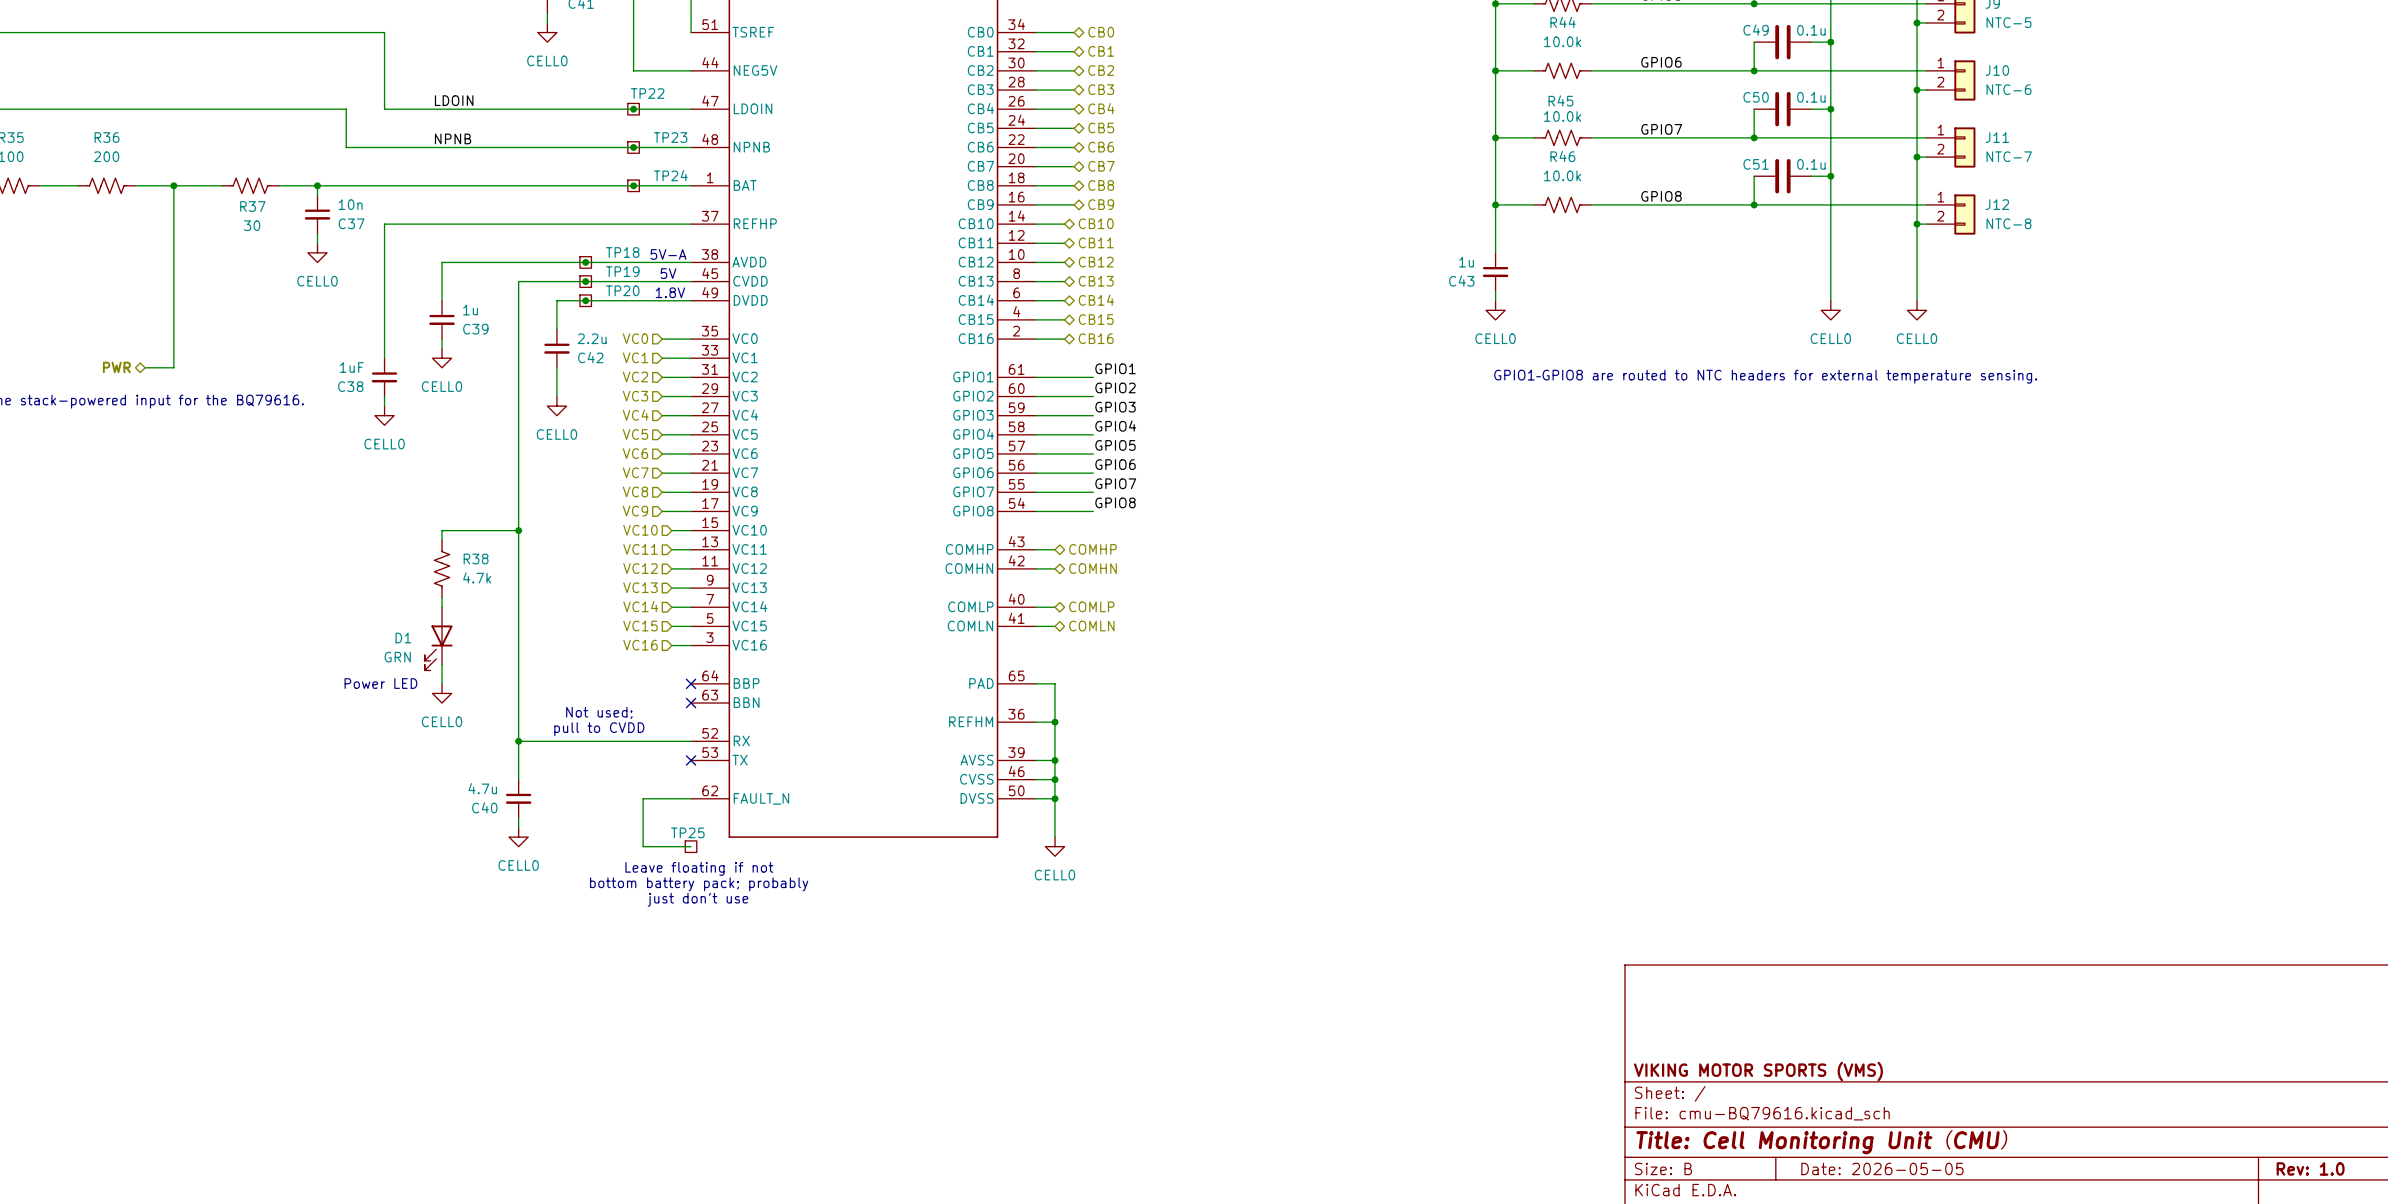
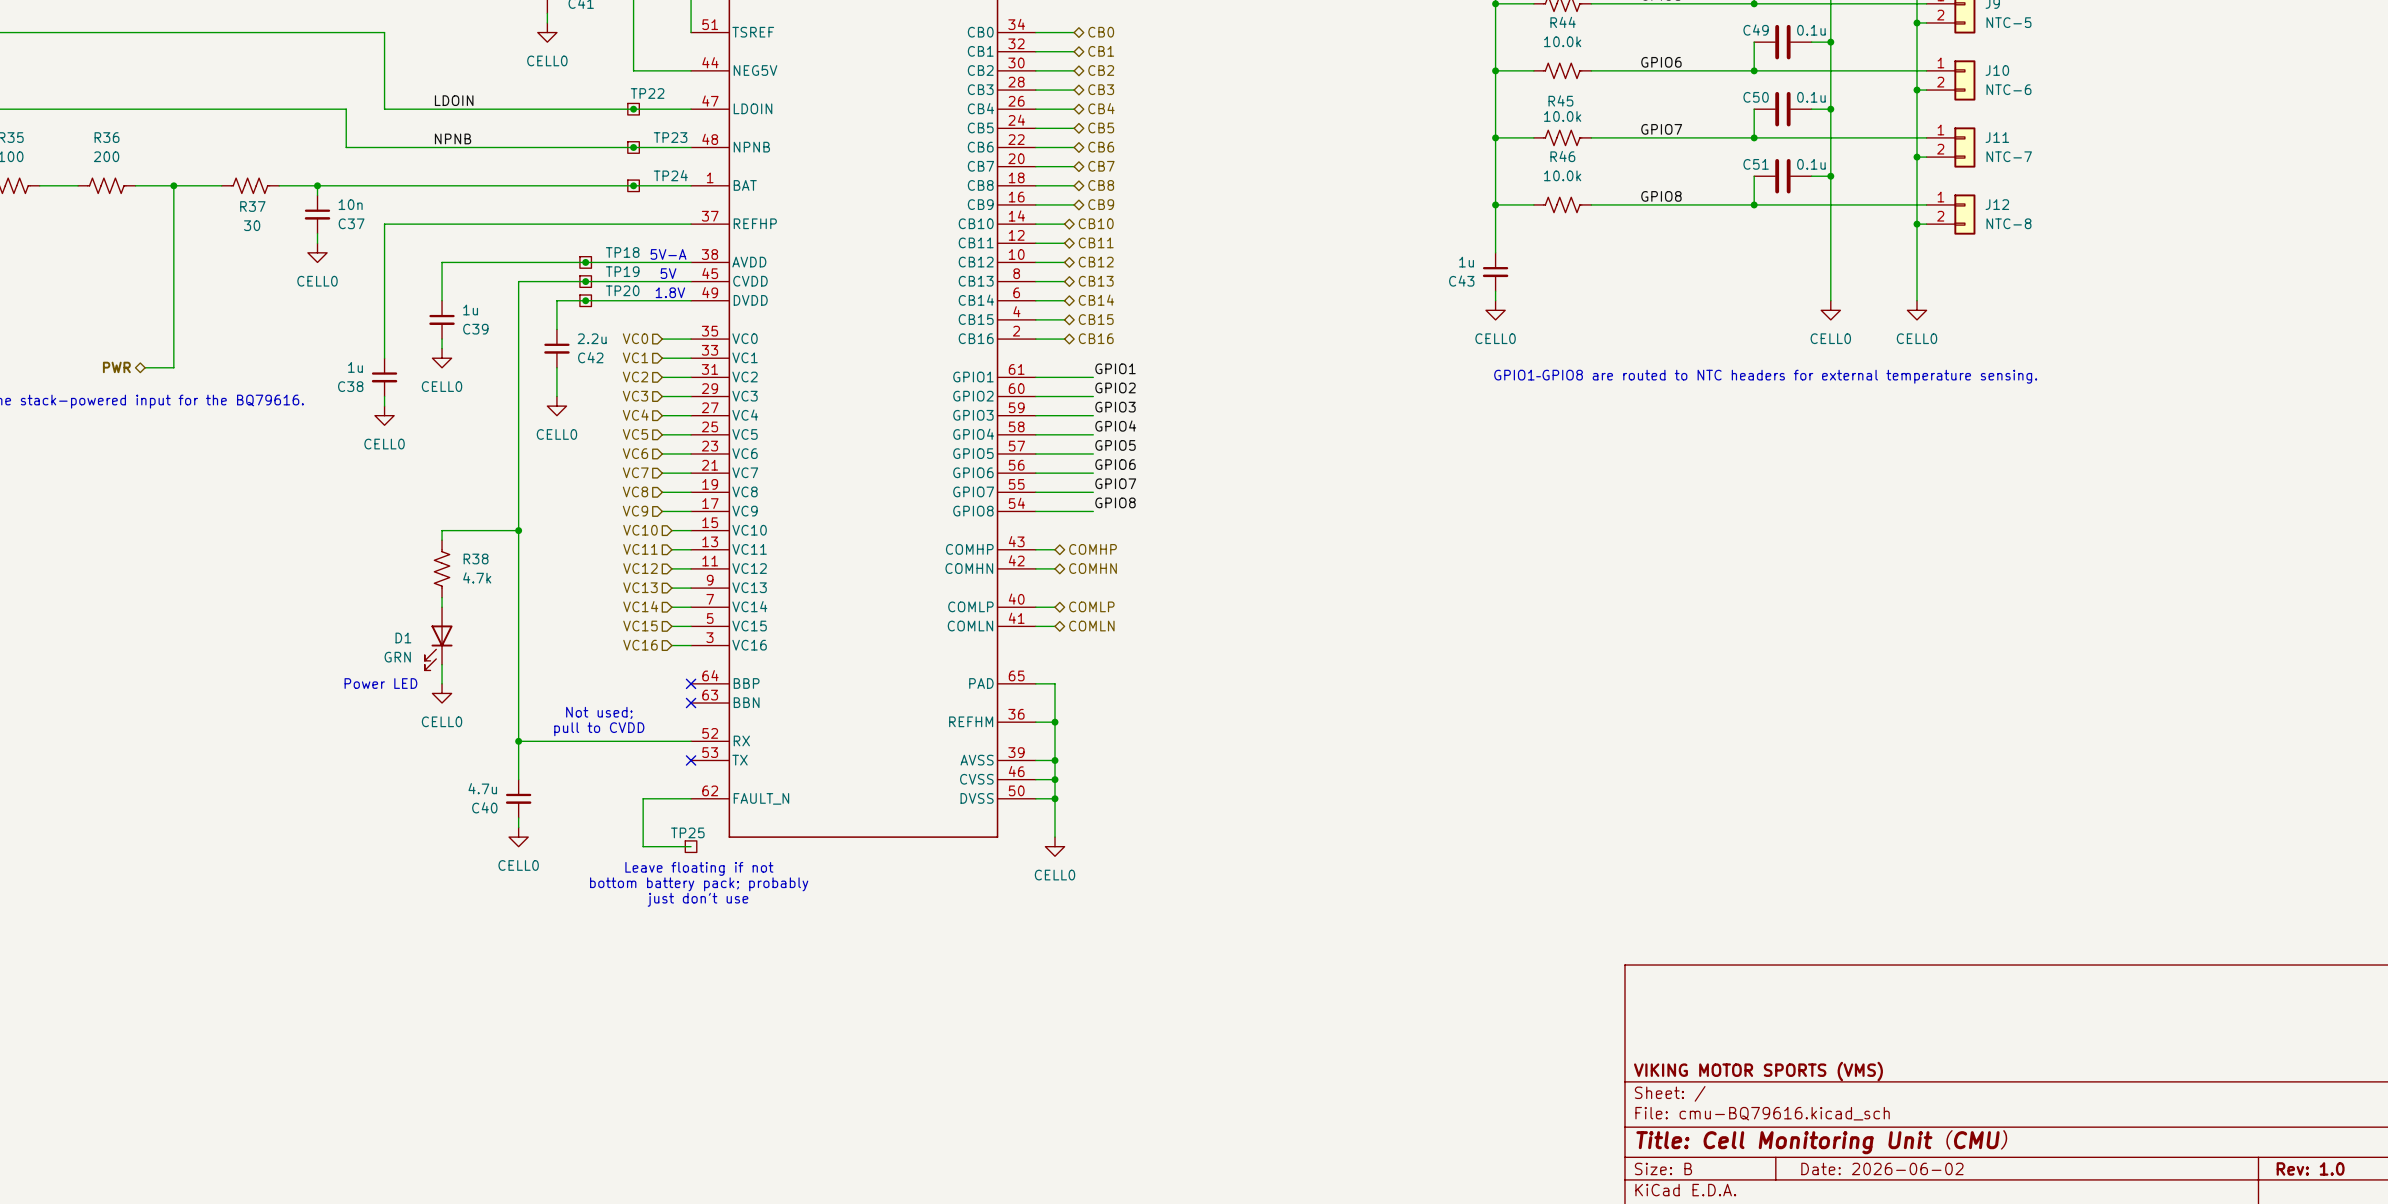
C38 value: 1uF (351, 367) -> 1u (355, 367)
title block: Date: 2026-05-05 (1882, 1168) -> Date: 2026-06-02 (1882, 1168)

